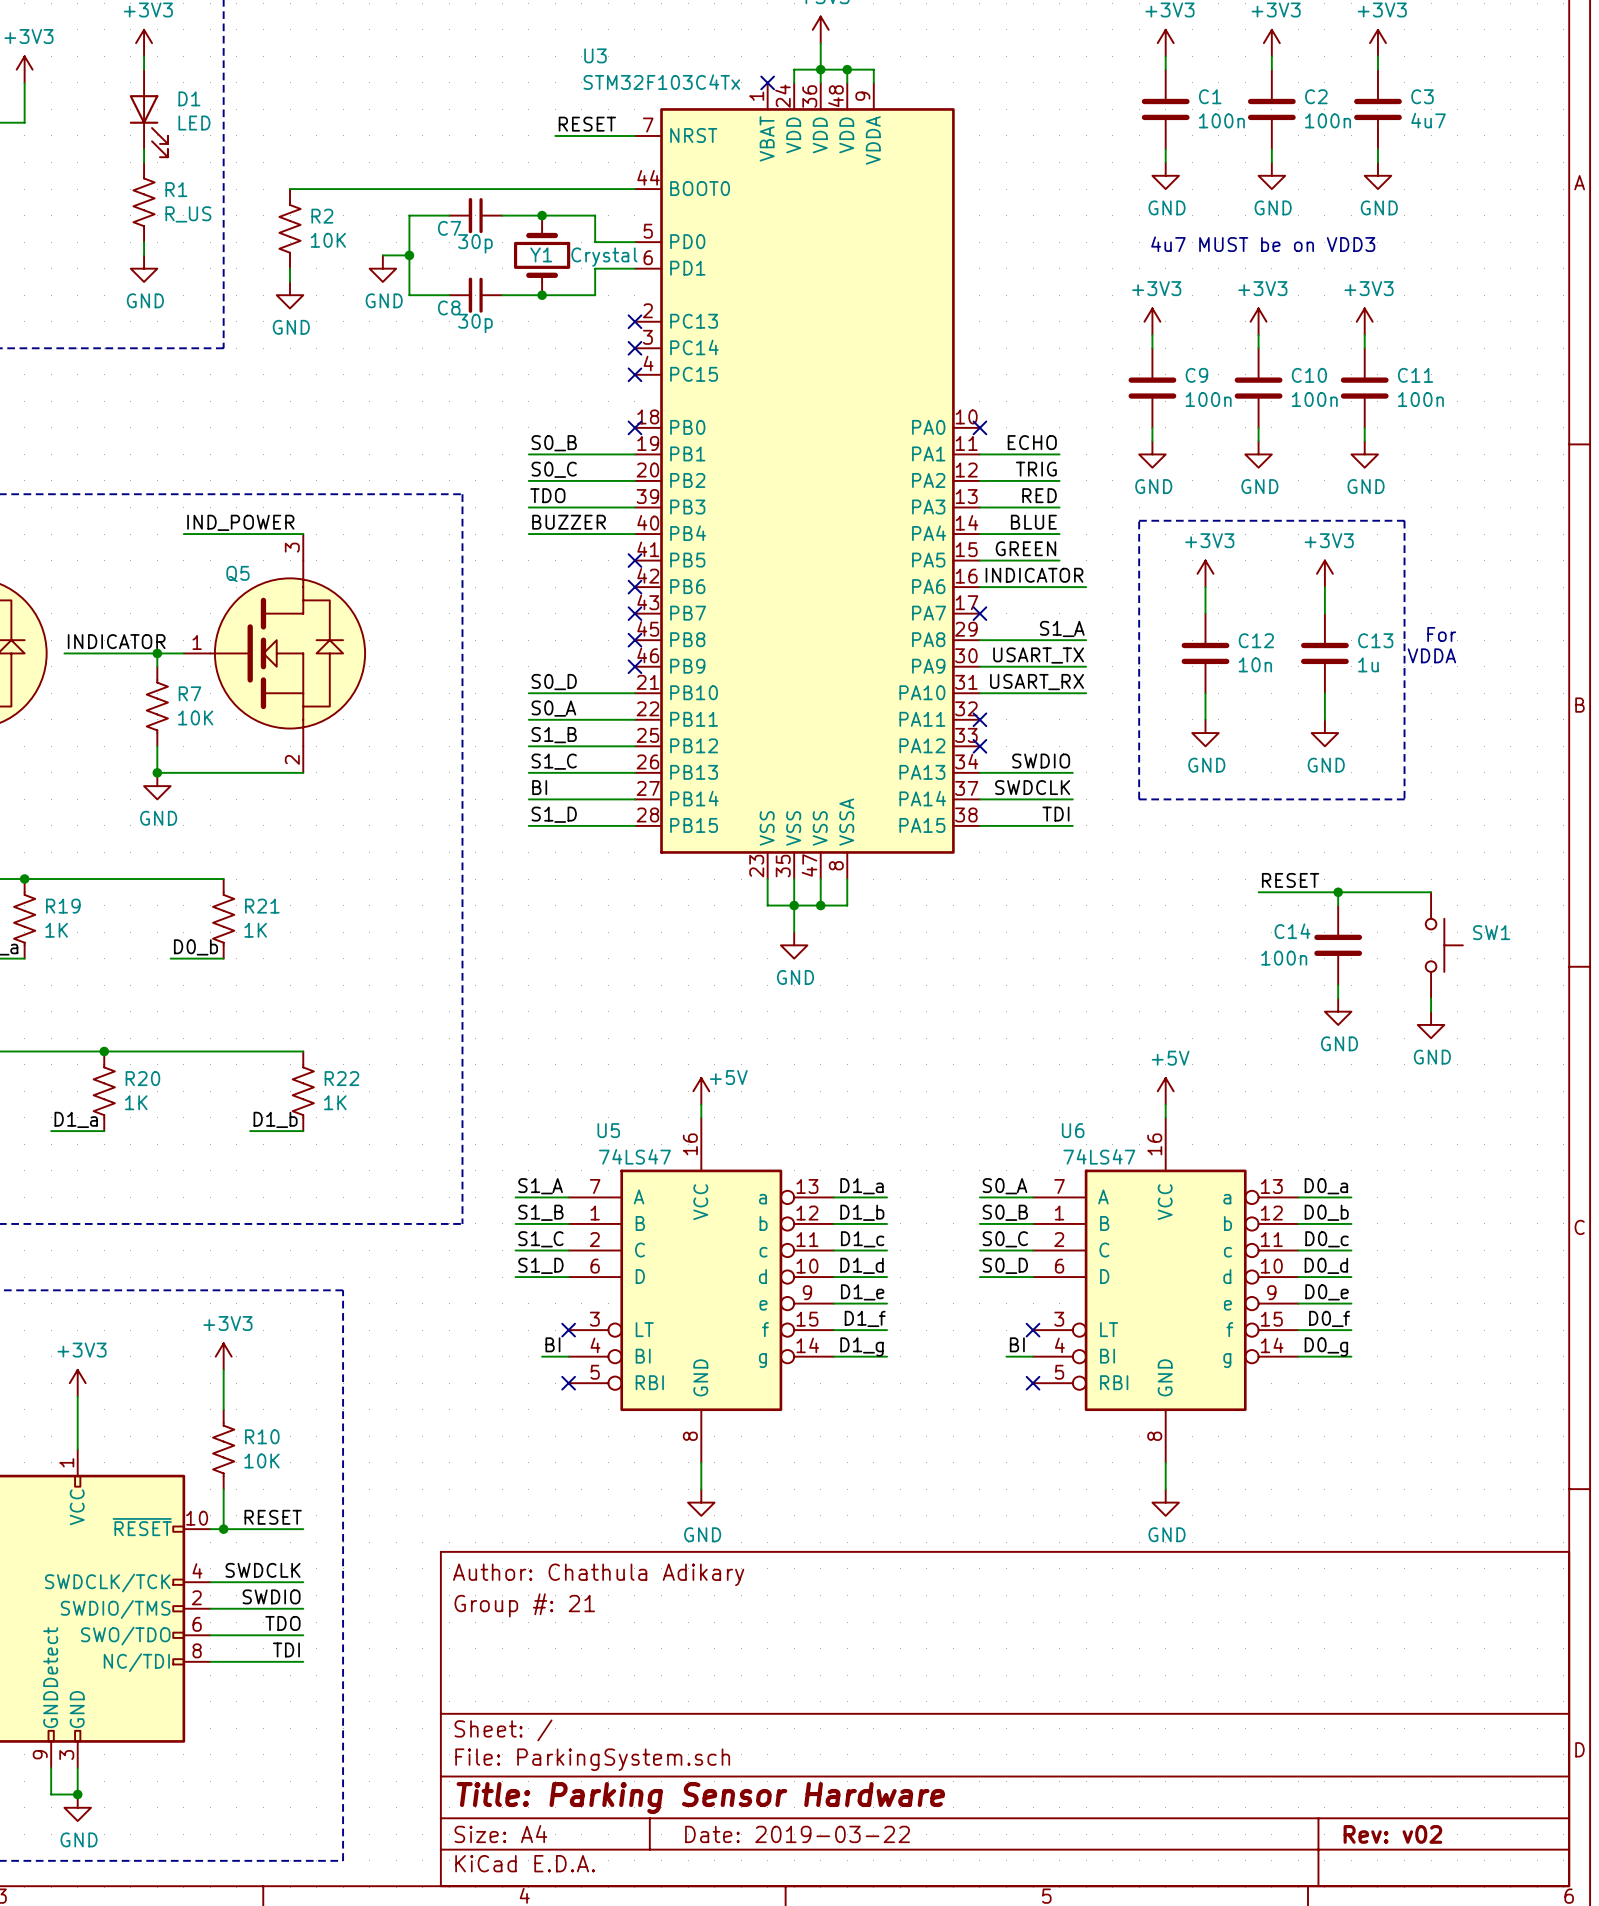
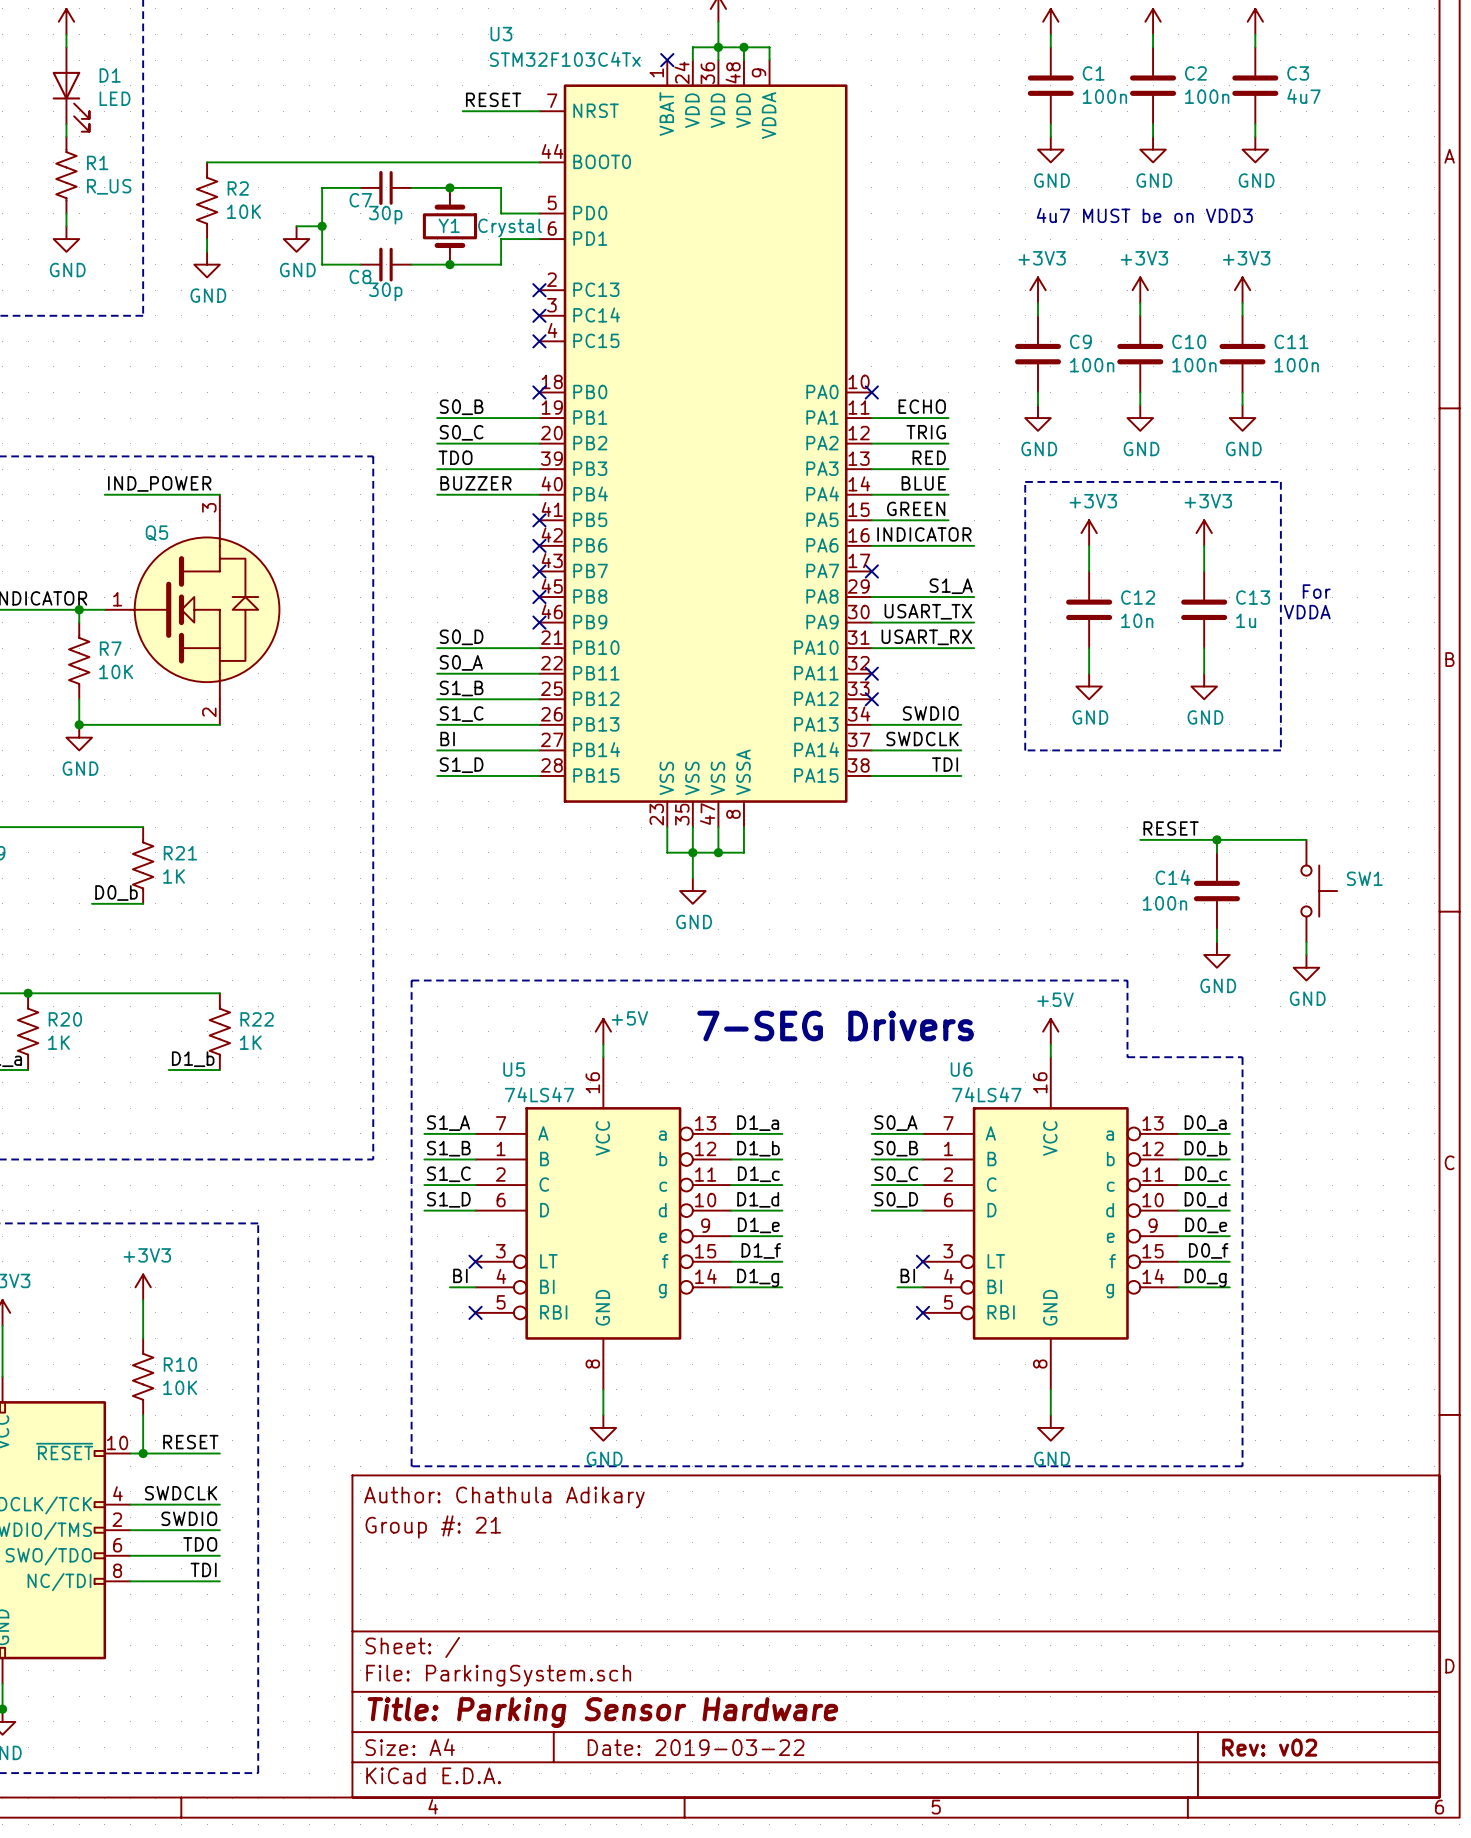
line: none -> (411, 980) (1127, 980) (1127, 1057) (1242, 1057) (1242, 1466) (411, 1466) (411, 980)
text: none -> 7-SEG Drivers (835, 1026)

